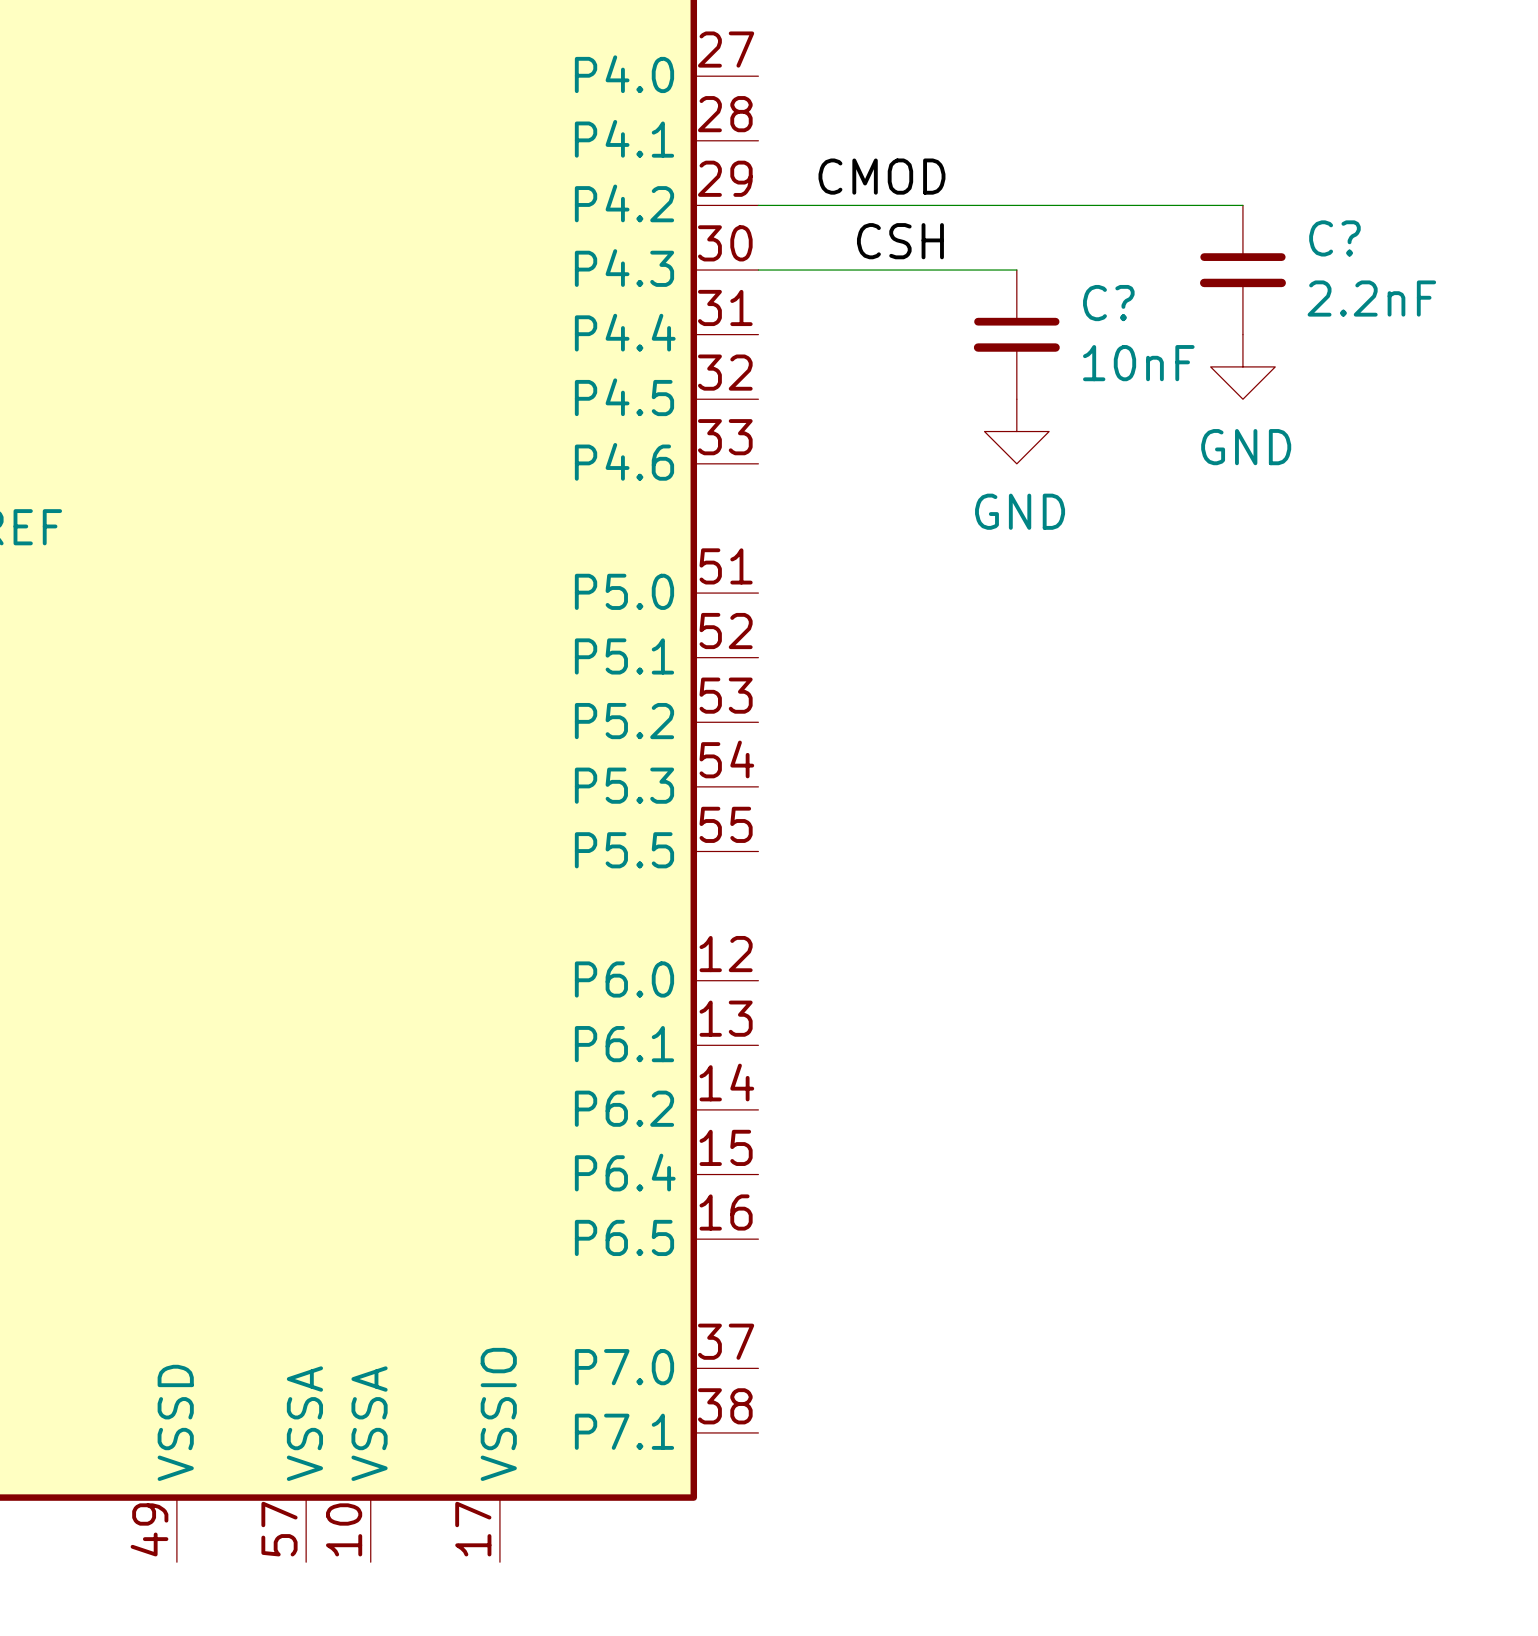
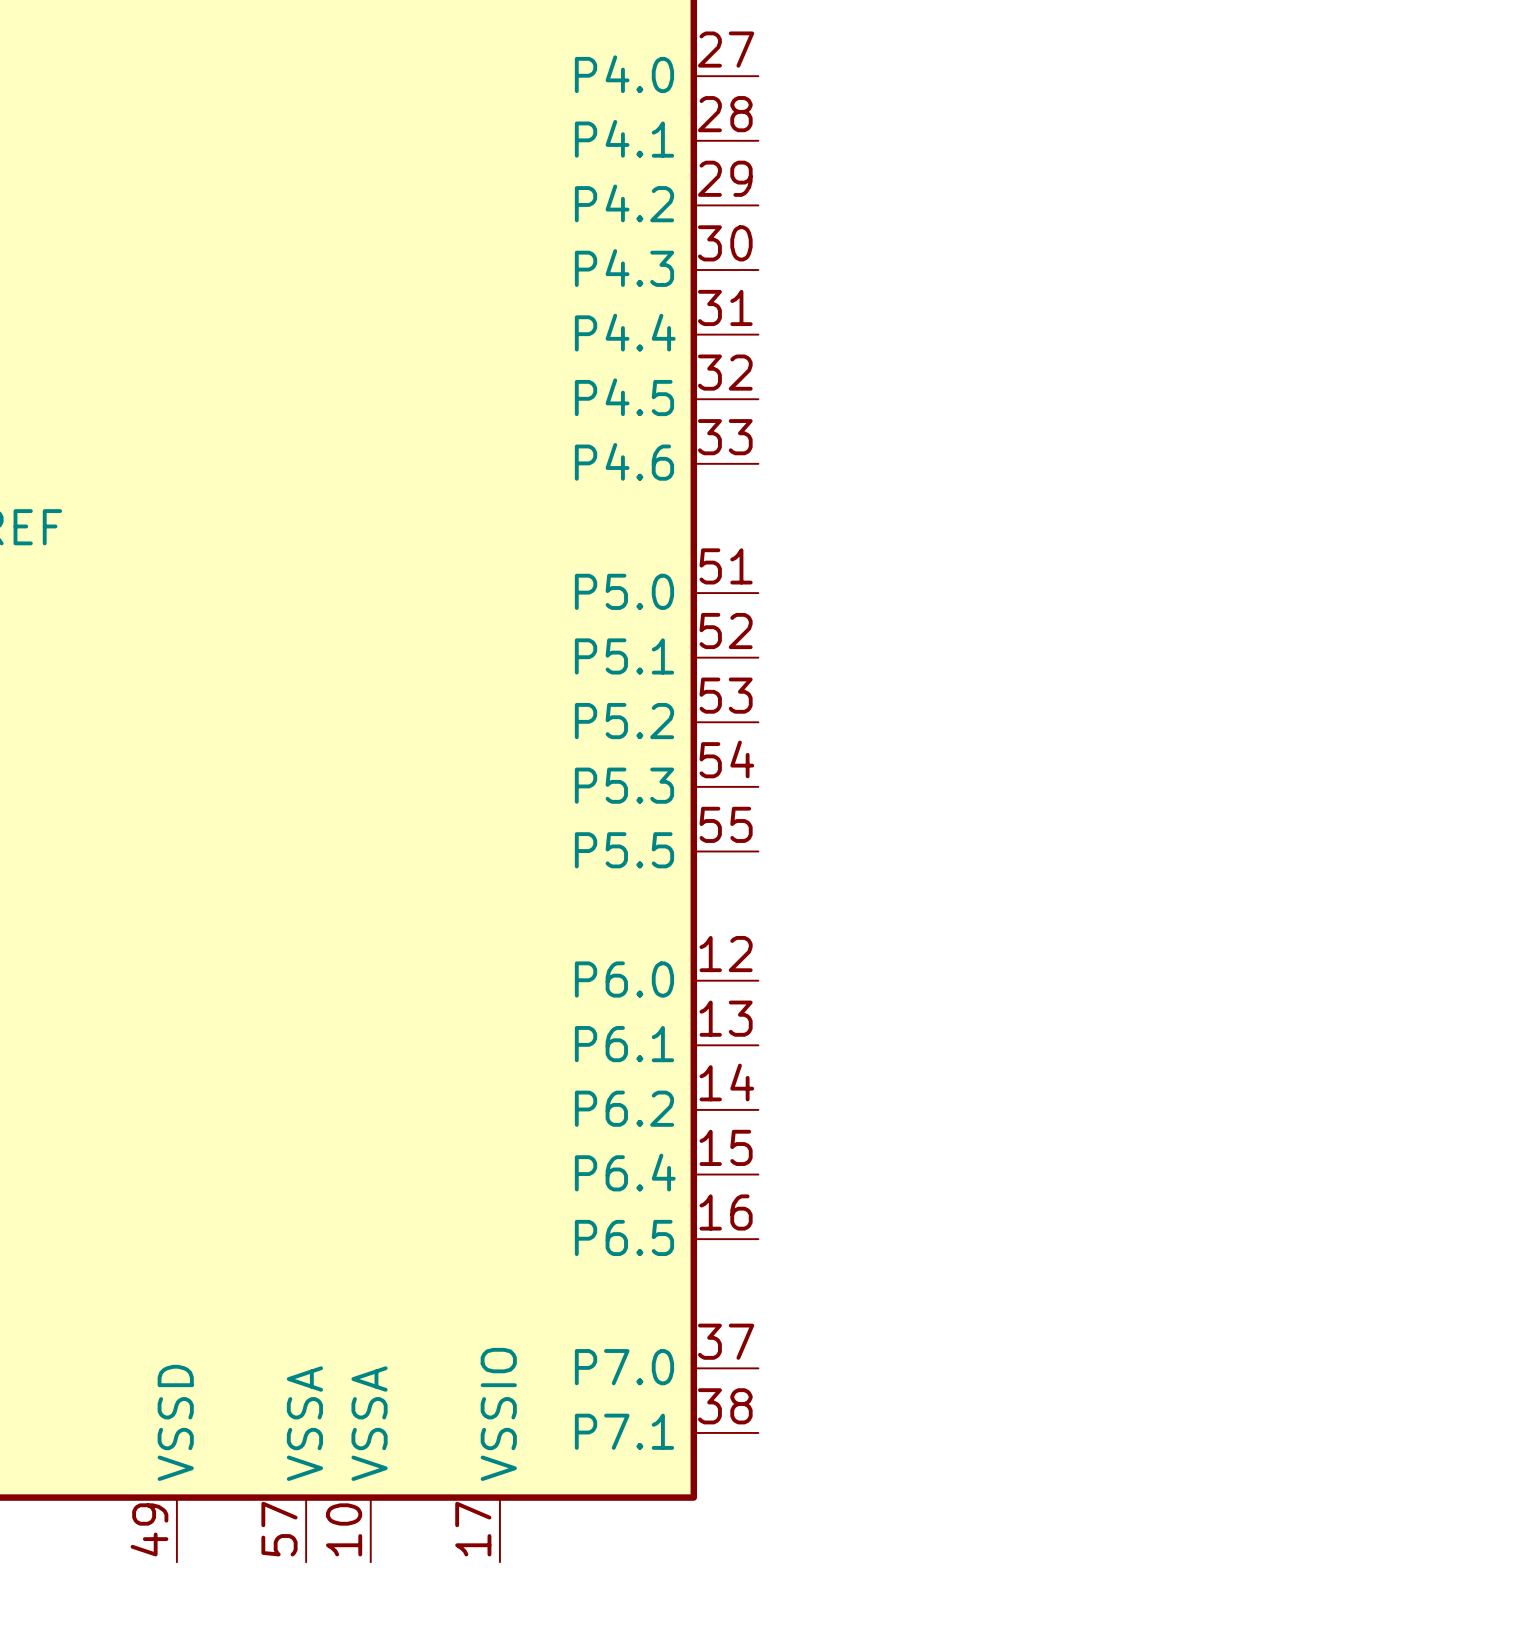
label: CMOD (881, 176) -> none
wire: (758, 205) (1242, 205) -> none
label: CSH (900, 241) -> none
wire: (758, 270) (1016, 270) -> none
C?: 2.2nF (1242, 270) -> none
C?: 10nF (1016, 334) -> none
power symbol: GND (1242, 366) -> none
power symbol: GND (1016, 431) -> none

